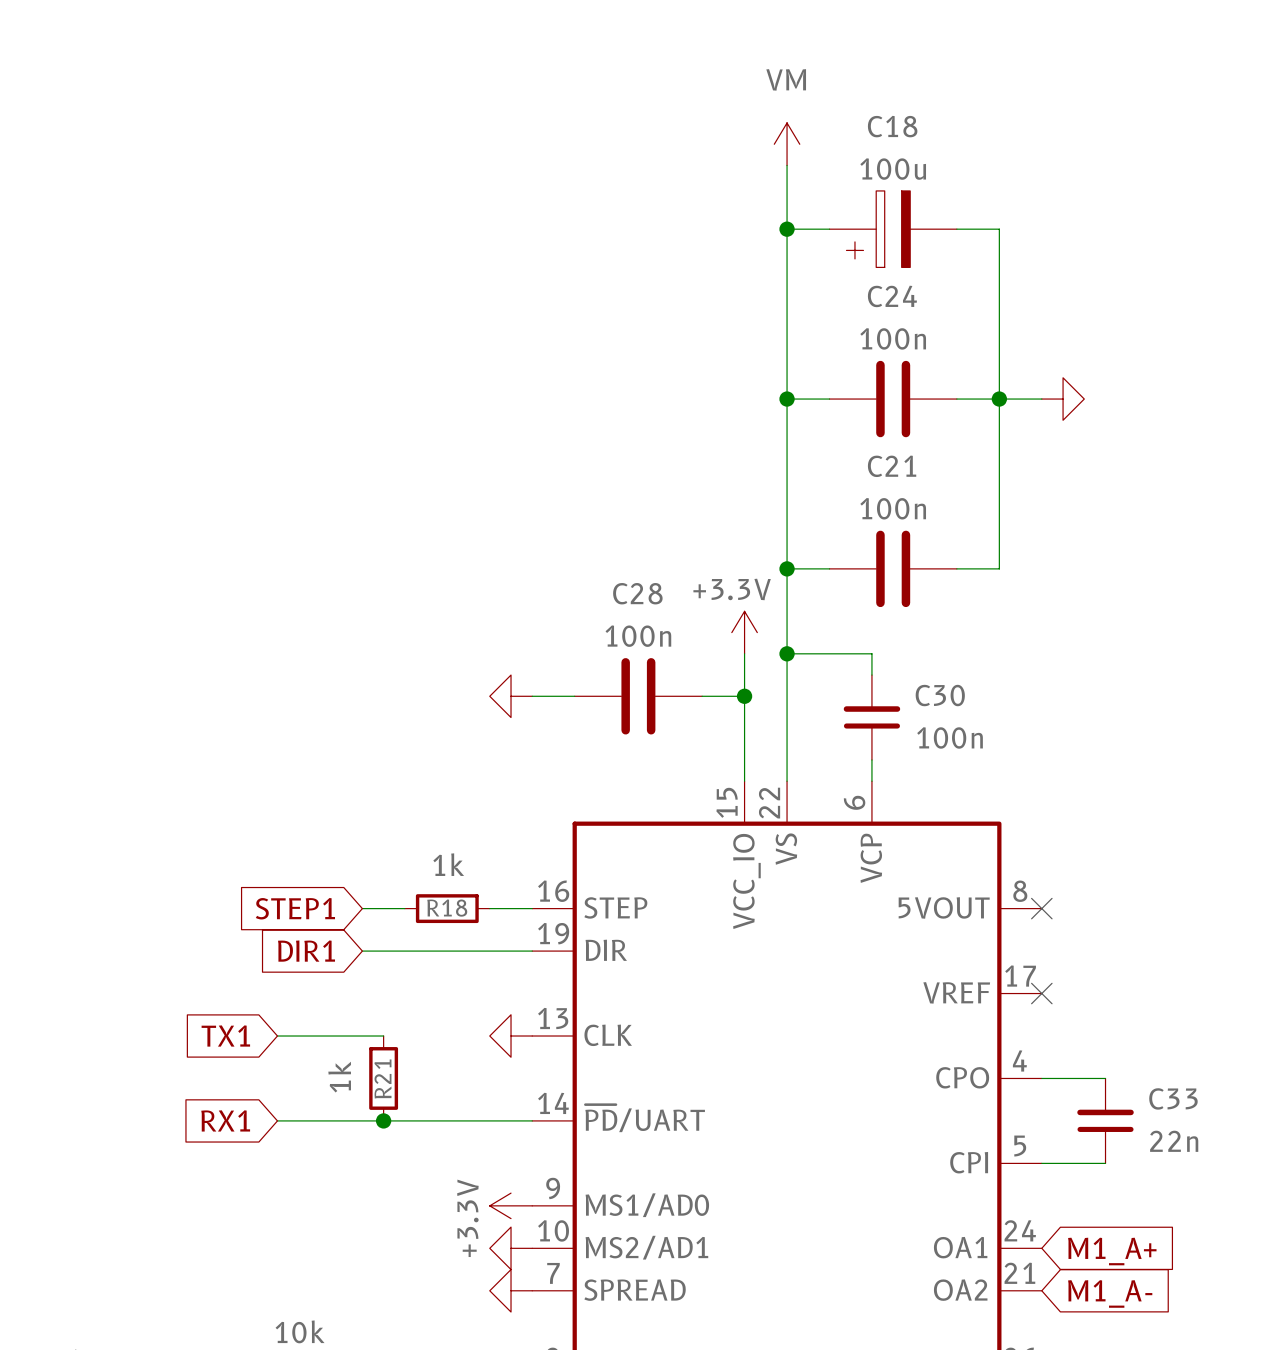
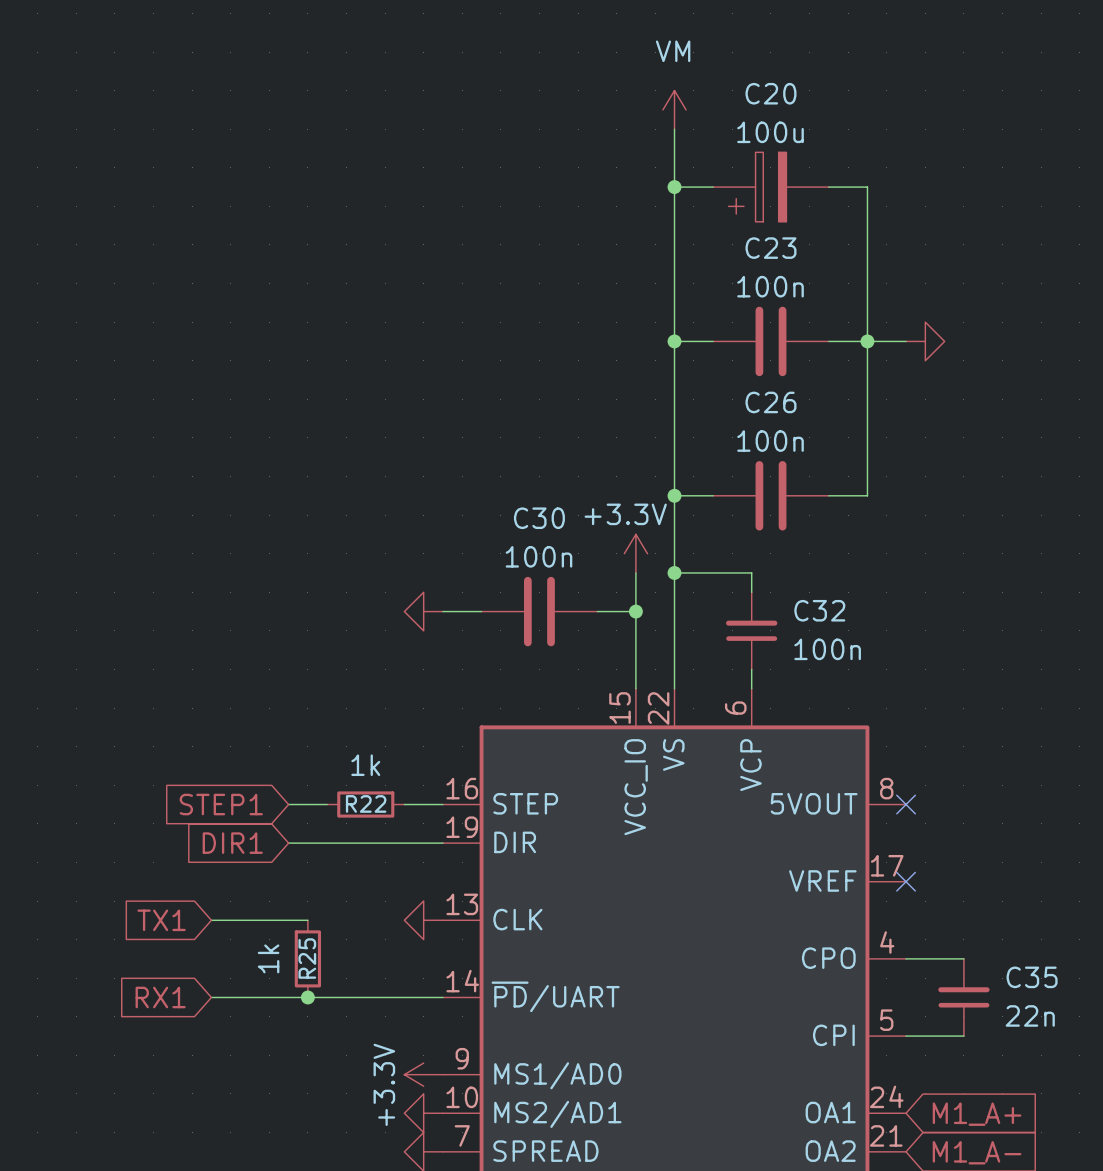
C18 name: C18 (892, 126) -> C20 (770, 93)
C24 name: C24 (892, 296) -> C23 (770, 248)
C21 name: C21 (892, 466) -> C26 (770, 402)
C28 name: C28 (637, 593) -> C30 (539, 518)
C30 name: C30 (940, 695) -> C32 (819, 610)
R18 name: R18 (447, 908) -> R22 (366, 803)
R21 name: R21 (382, 1079) -> R25 (307, 958)
C33 name: C33 (1173, 1098) -> C35 (1032, 977)

